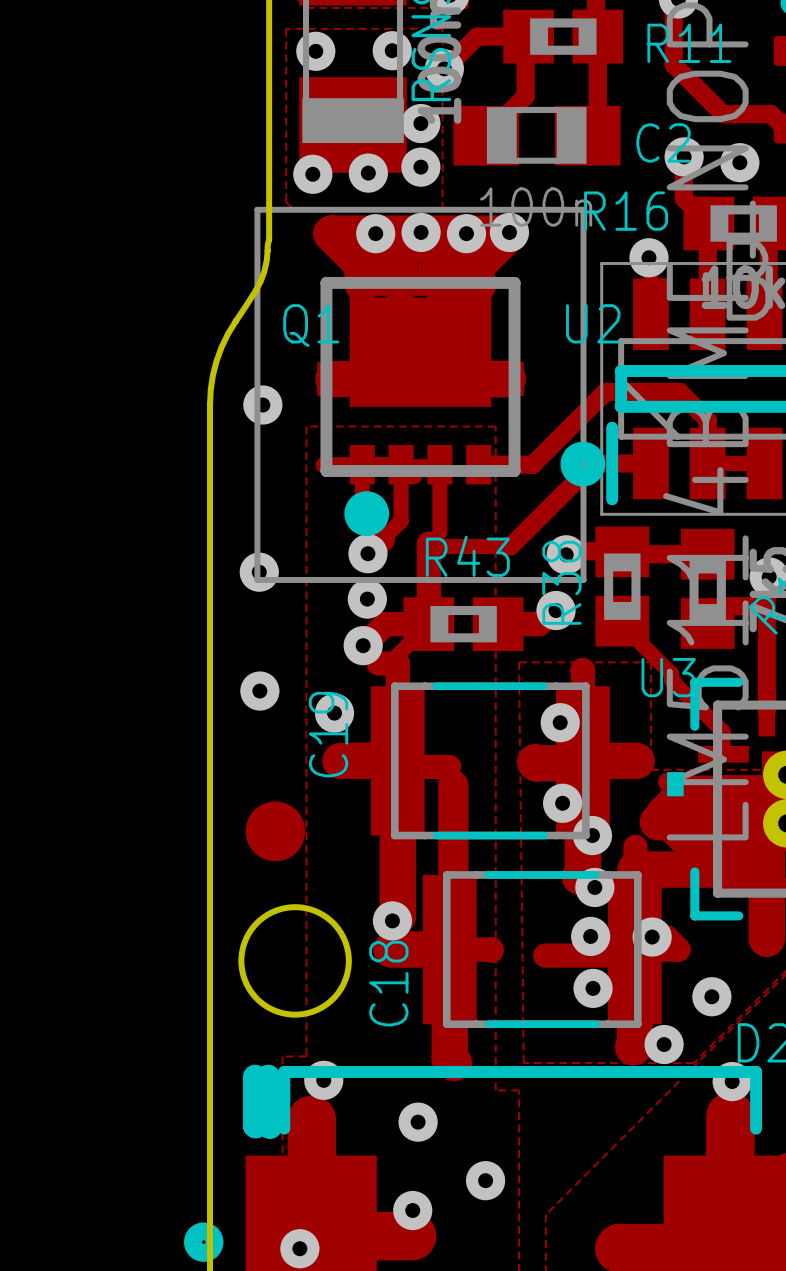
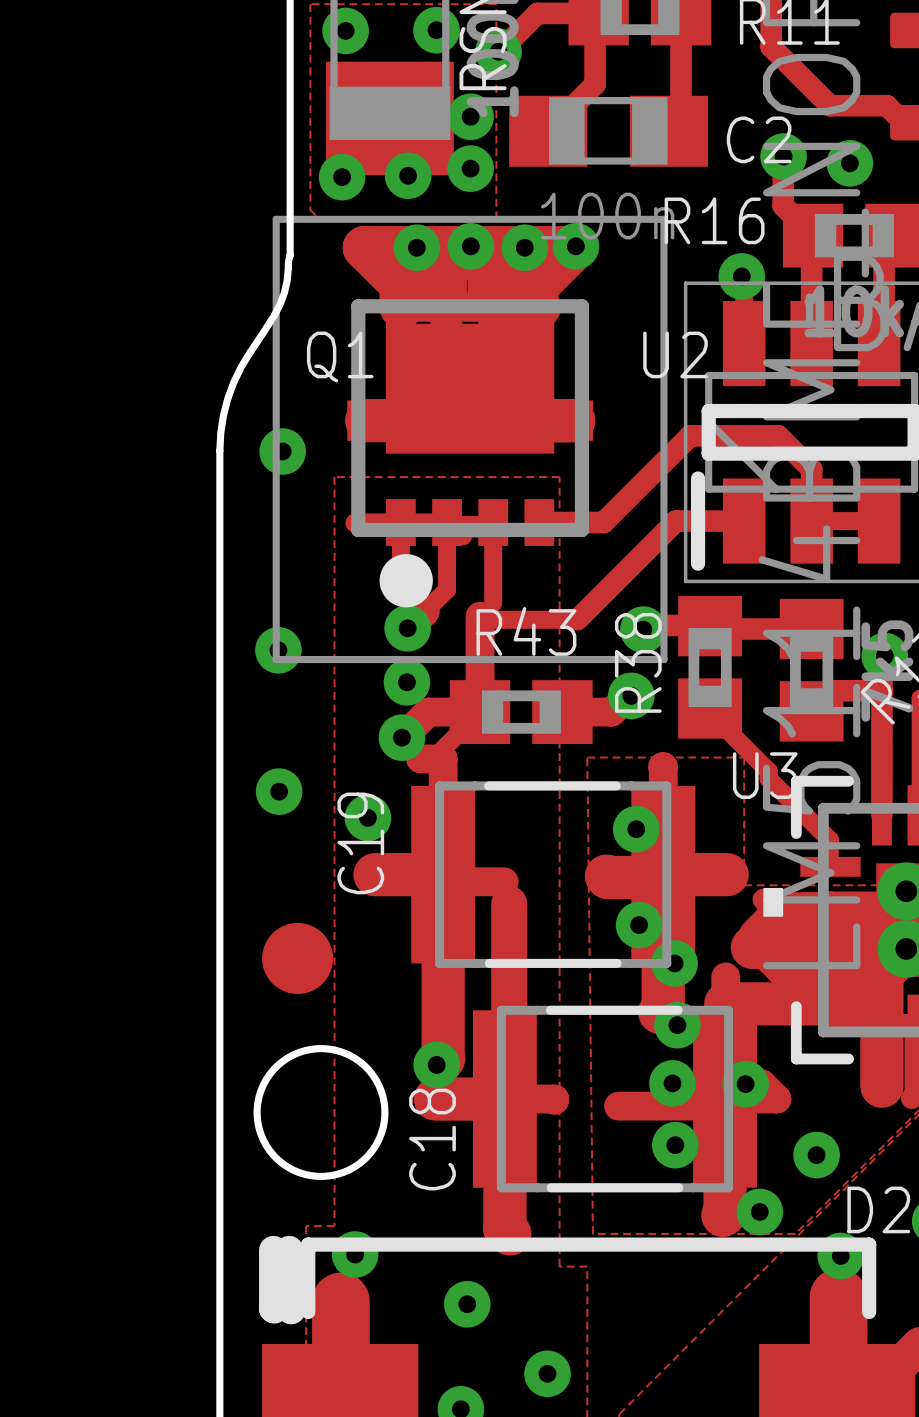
drawing: [560, 441, 606, 487] -> none

